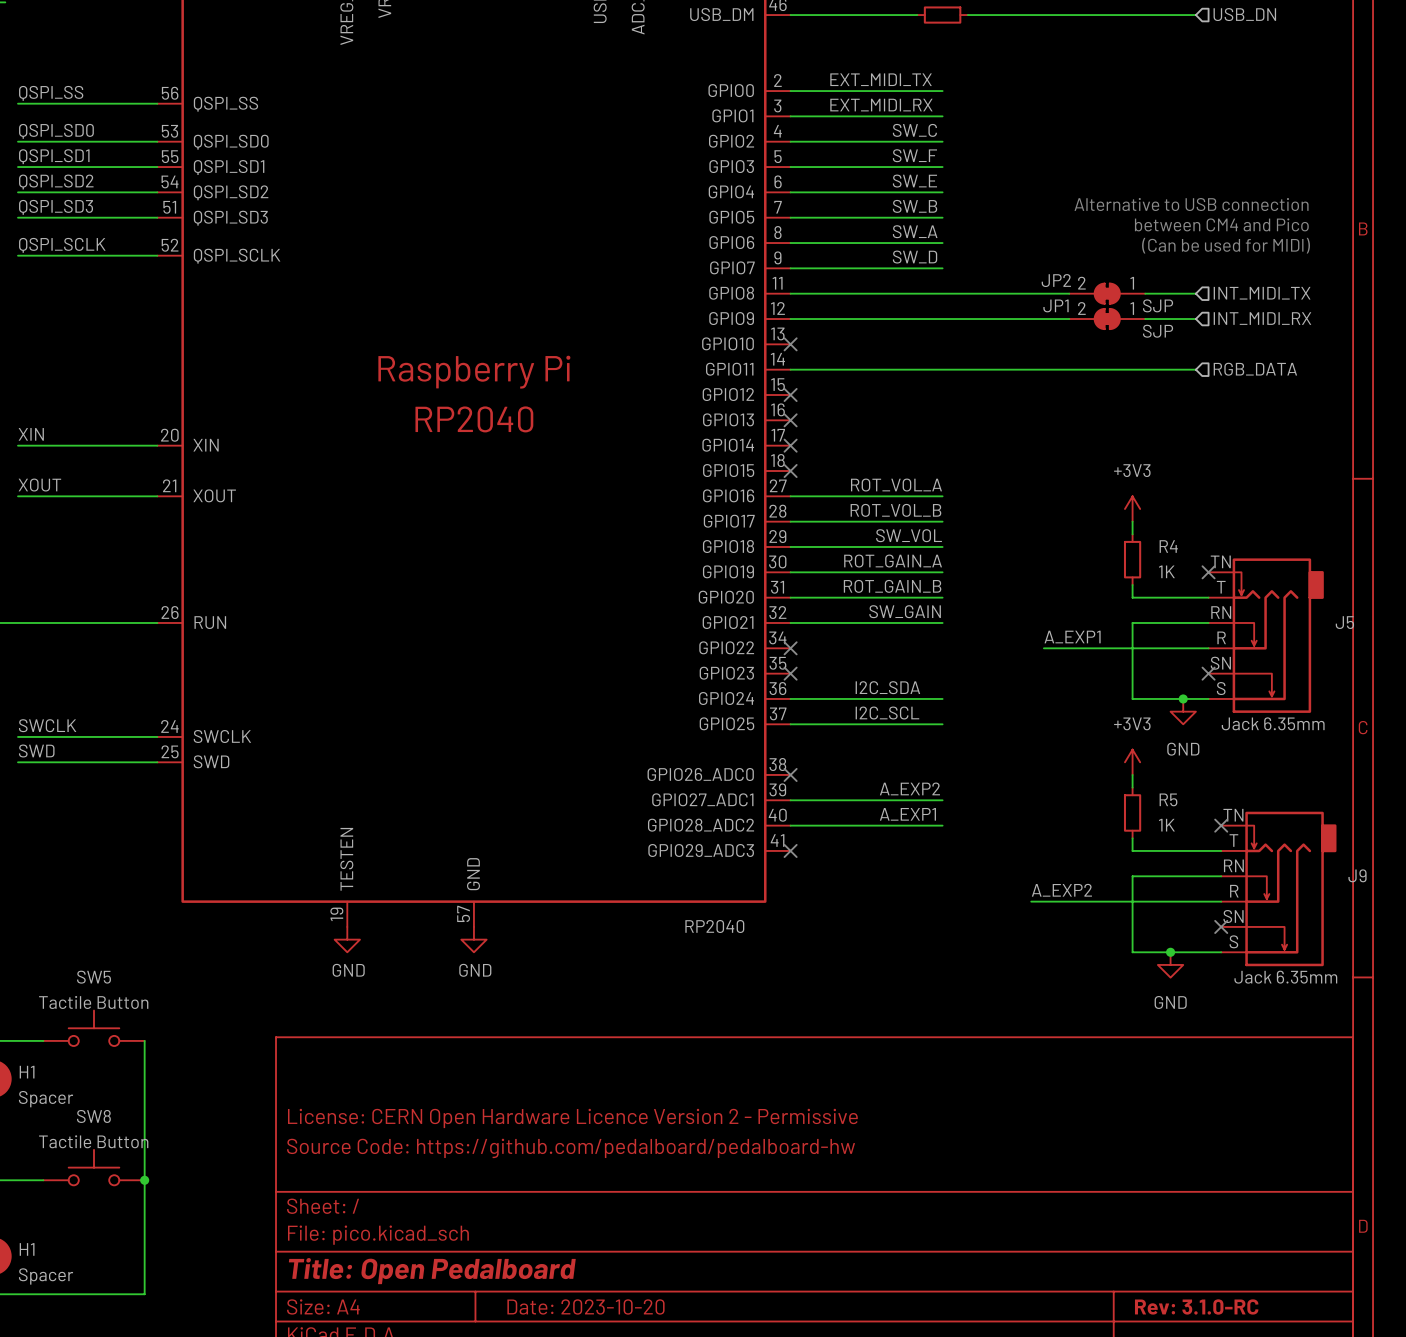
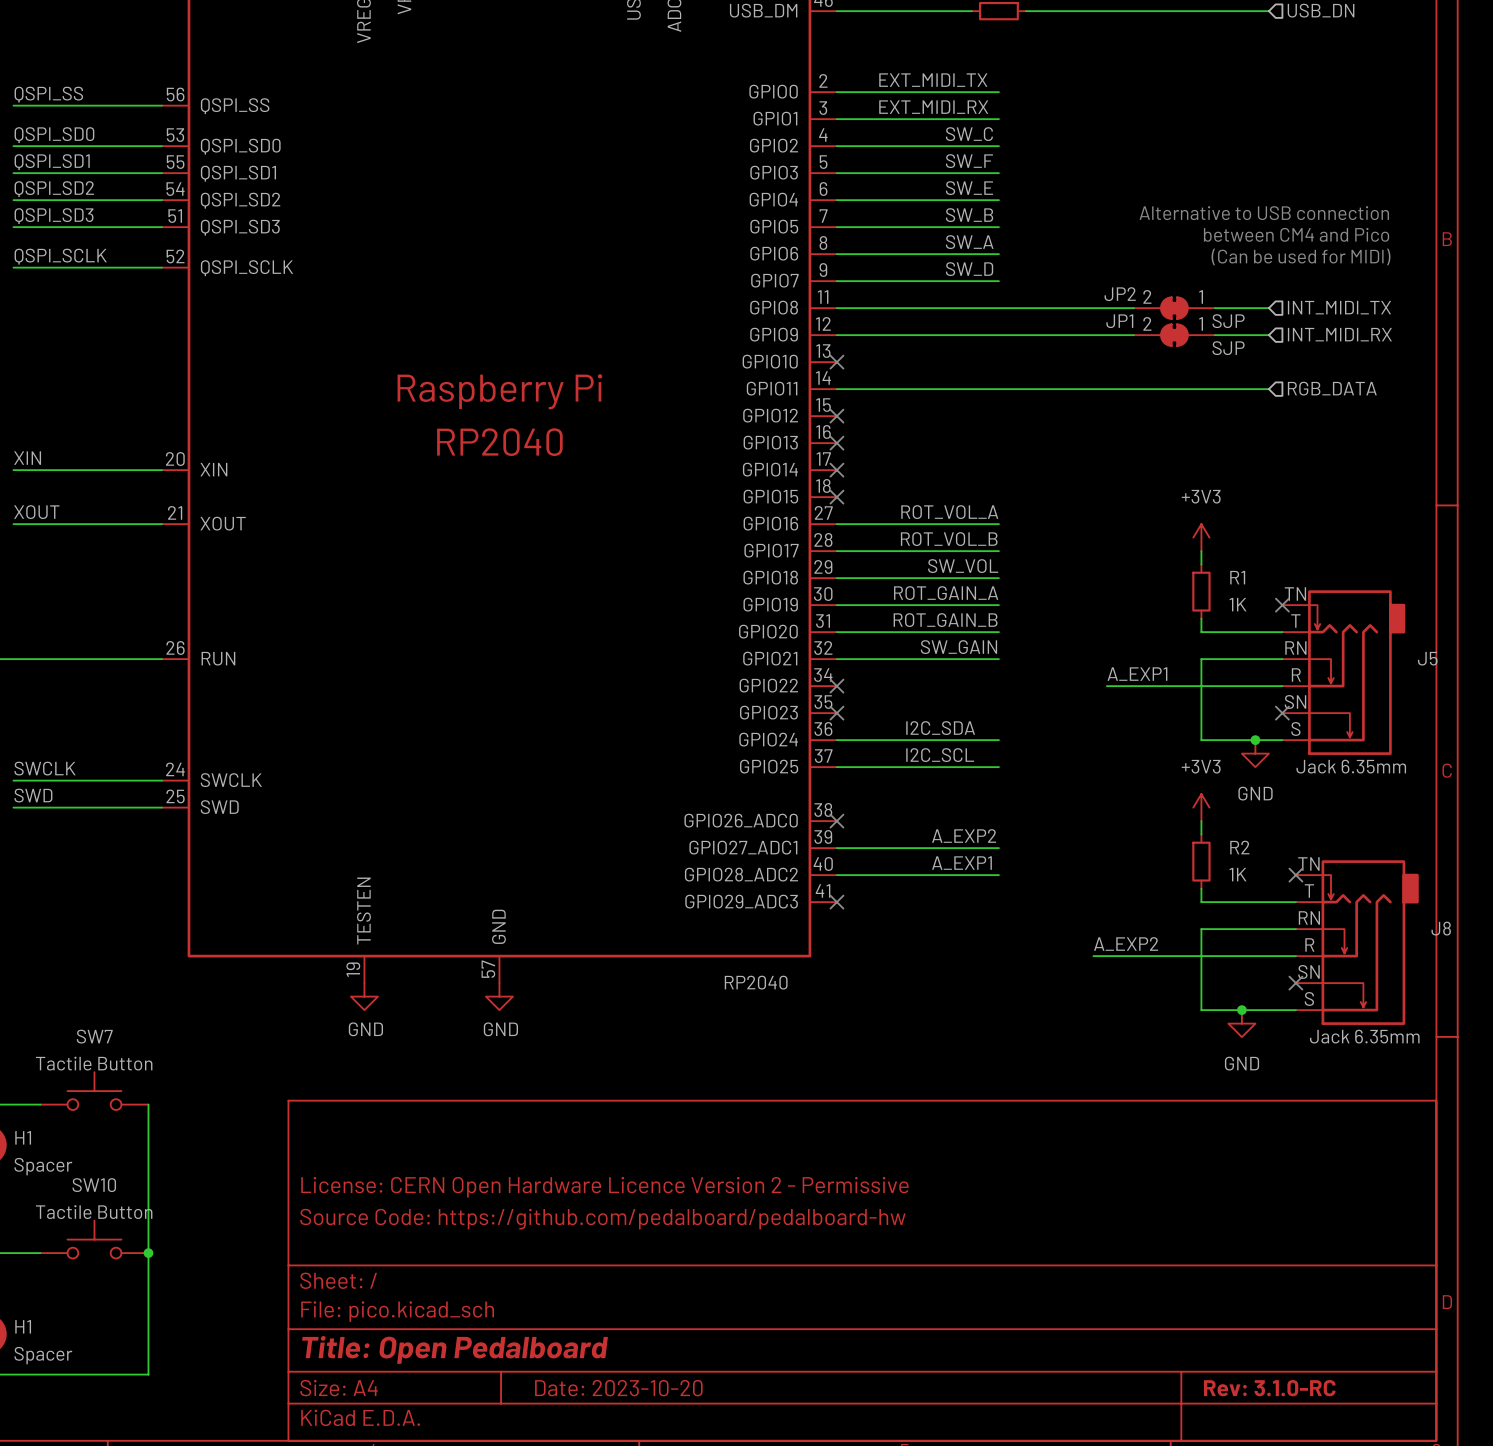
R4 name: R4 (1168, 546) -> R1 (1237, 577)
R5 name: R5 (1168, 799) -> R2 (1239, 847)
J9 name: J9 (1357, 875) -> J8 (1441, 928)
SW5 name: SW5 (94, 977) -> SW7 (94, 1036)
SW8 name: SW8 (93, 1116) -> SW10 (94, 1185)

